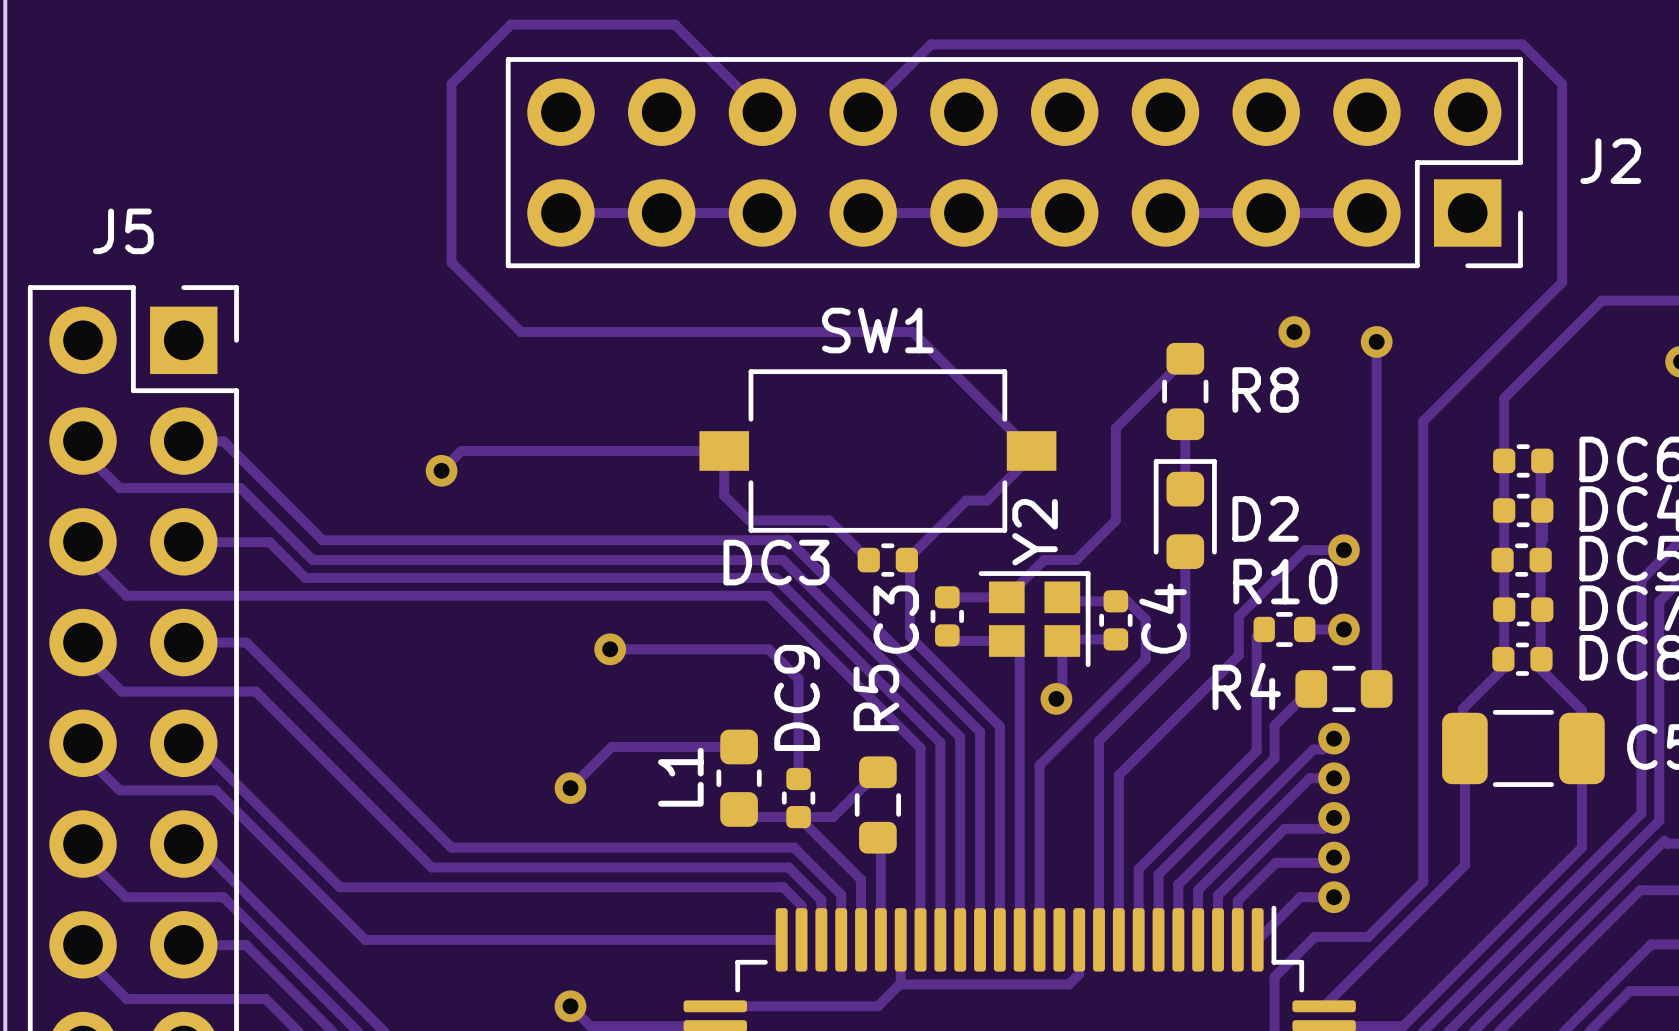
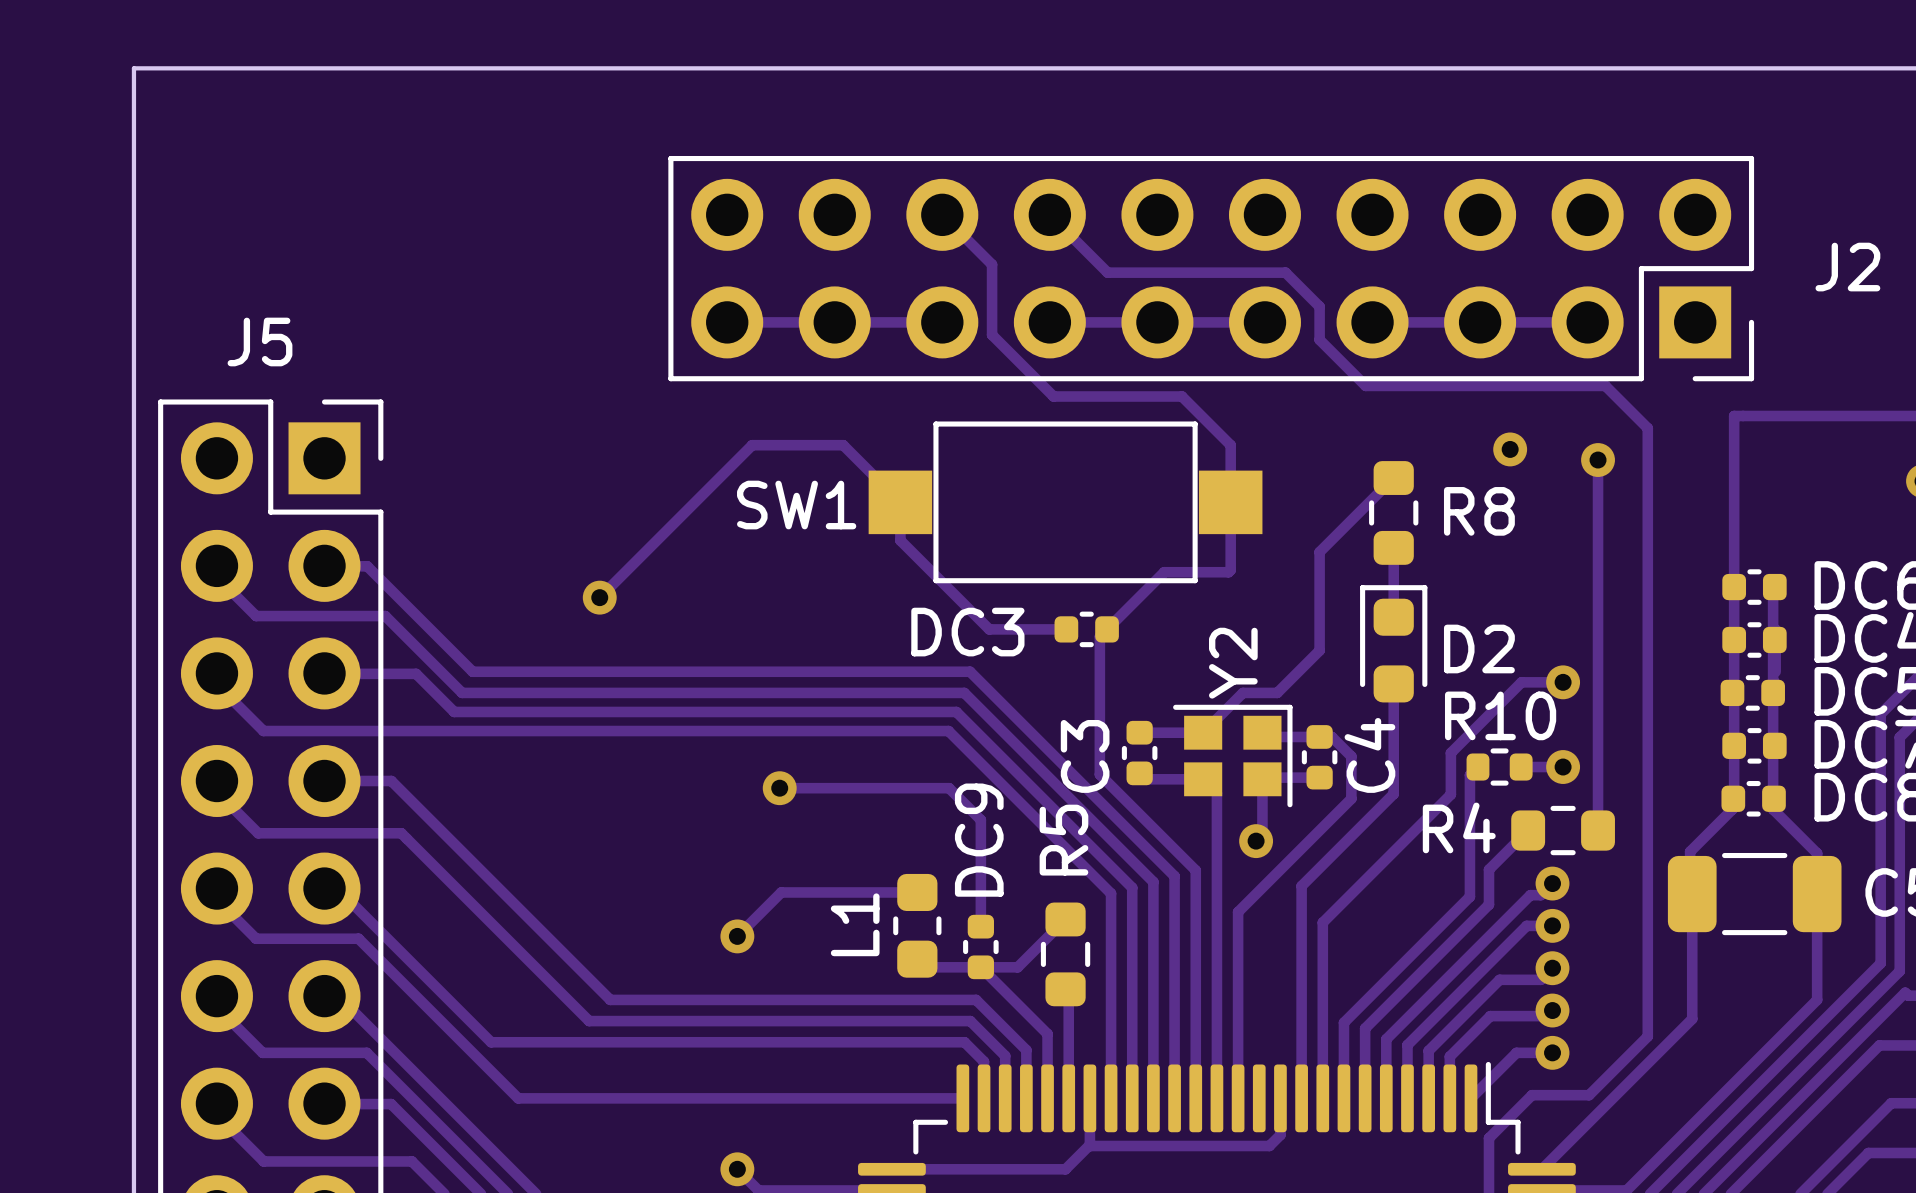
track: (762, 112) (674, 24) (511, 24) (451, 84) (451, 262) (520, 331) (912, 331) (1031, 450) -> (942, 214) (992, 264) (992, 334) (1053, 396) (1181, 396) (1230, 445) (1230, 570)
track: (863, 112) (931, 44) (1522, 44) (1562, 84) (1562, 282) (1423, 421) -> (1049, 214) (1107, 272) (1285, 272) (1319, 306) (1319, 339) (1365, 385) (1605, 385) (1647, 428) (1647, 544)
track: (1601, 300) (1504, 398) -> (1838, 415) (1734, 415) (1734, 520)
SW1 name position: SW1 (877, 330) -> SW1 (796, 505)
SW1 footprint: [699, 369, 1057, 533] -> [868, 421, 1263, 584]
track: (1031, 447) (1031, 455) (986, 500) (966, 500) (906, 560) (910, 563) -> (1217, 572) (1164, 572) (1099, 636) (1099, 696)
track: (461, 450) (724, 450) (724, 495) (748, 520) (829, 520) (868, 560) (865, 560) -> (620, 576) (752, 445) (843, 445) (900, 502) (900, 540) (989, 629) (1066, 629)
DC3 position: (887, 560) -> (1086, 629)

